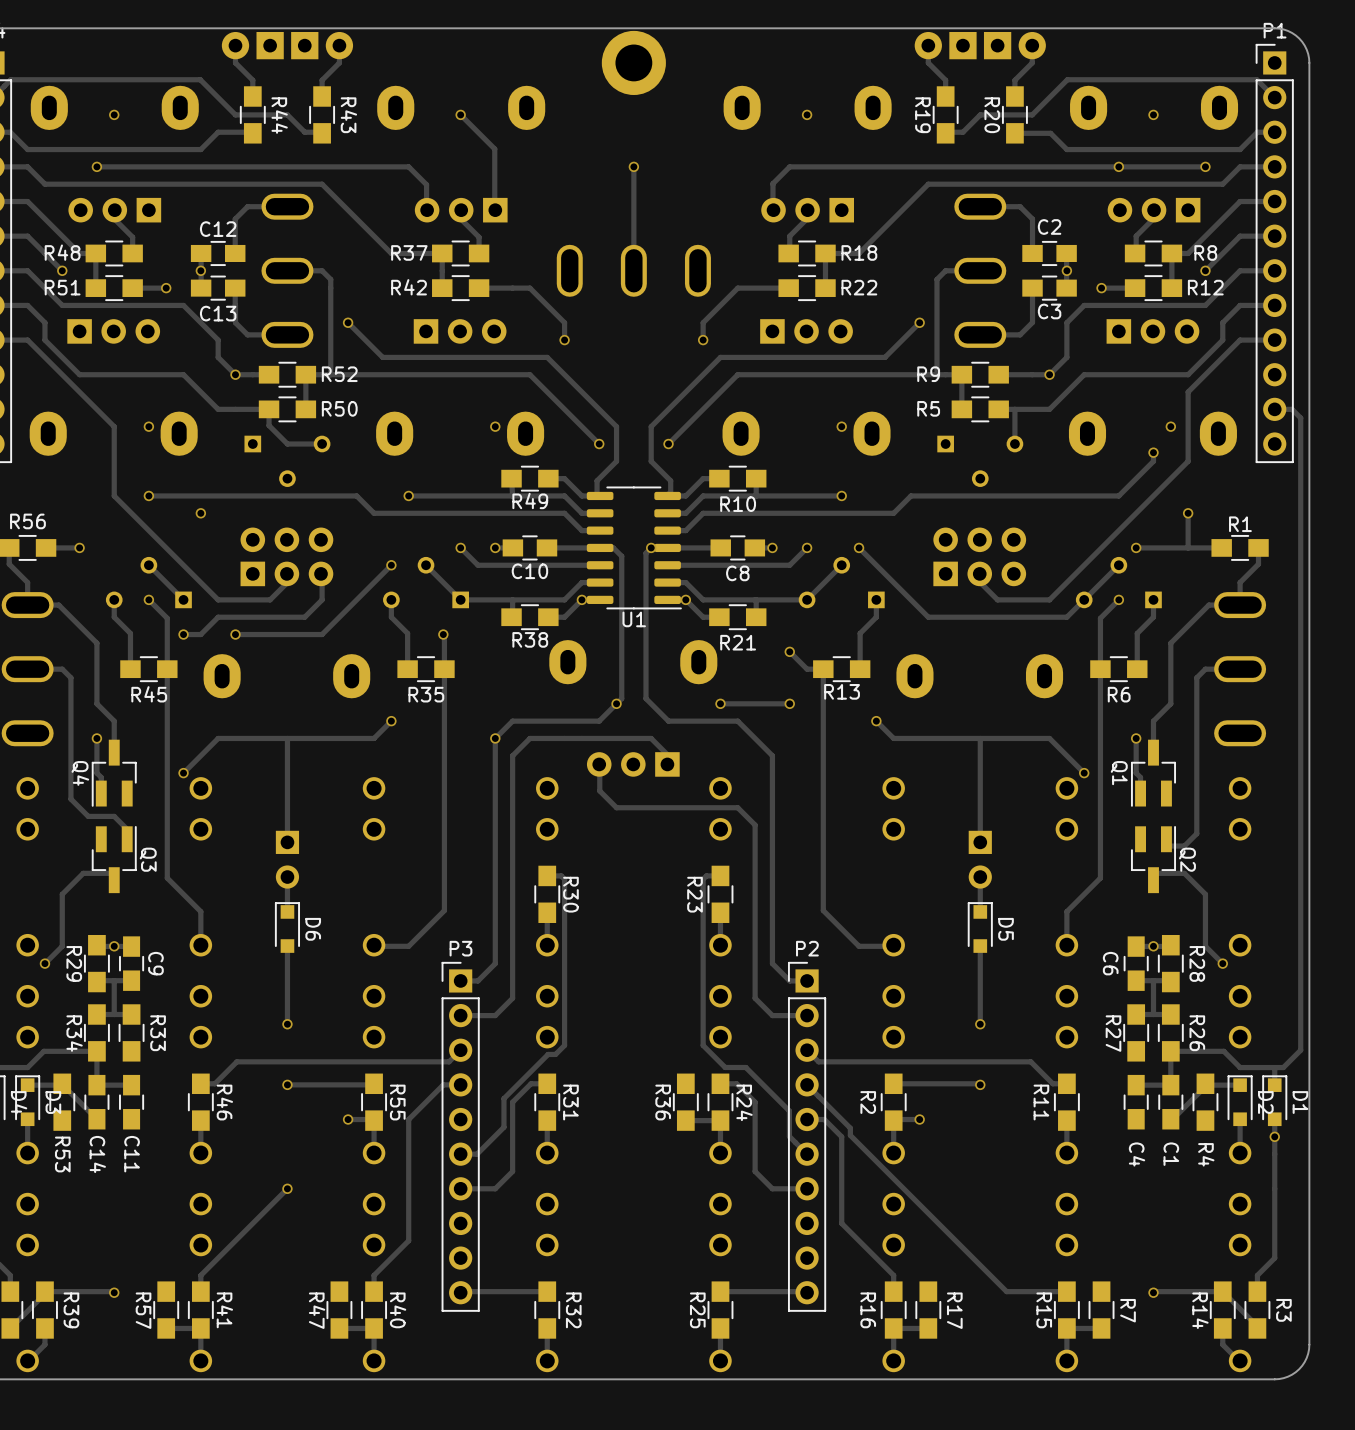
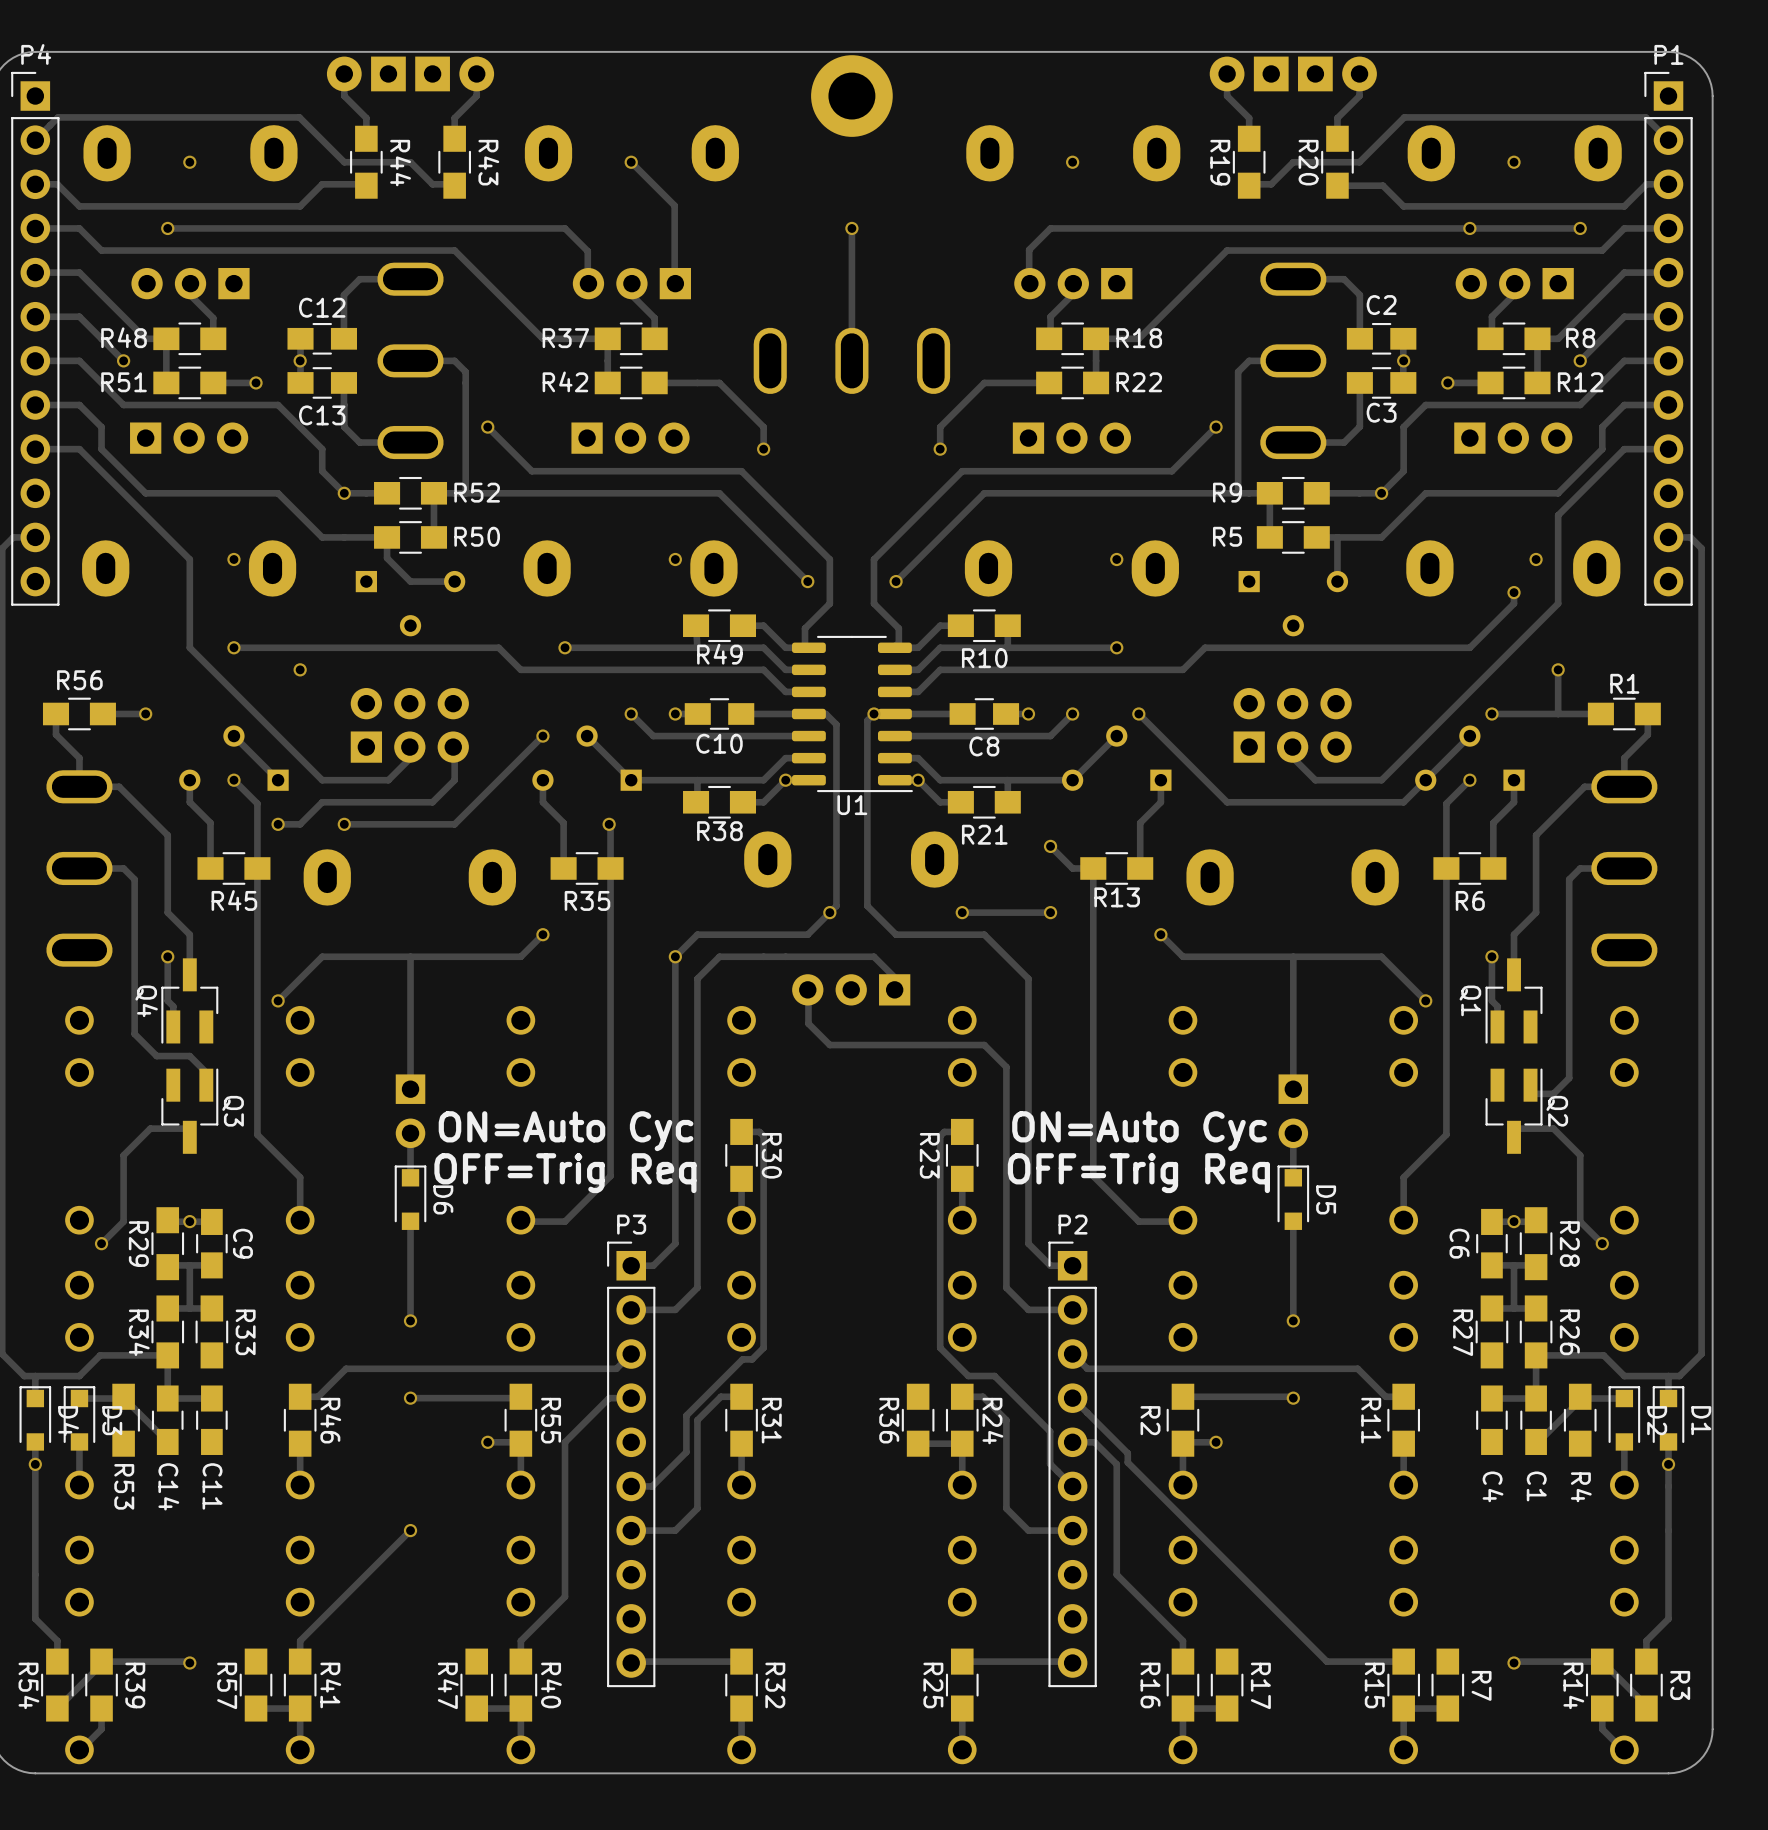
text: none -> ON=Auto Cyc (566, 1131)
text: none -> ON=Auto Cyc (1139, 1131)
text: none -> OFF=Trig Req (565, 1173)
text: none -> OFF=Trig Req (1138, 1173)

